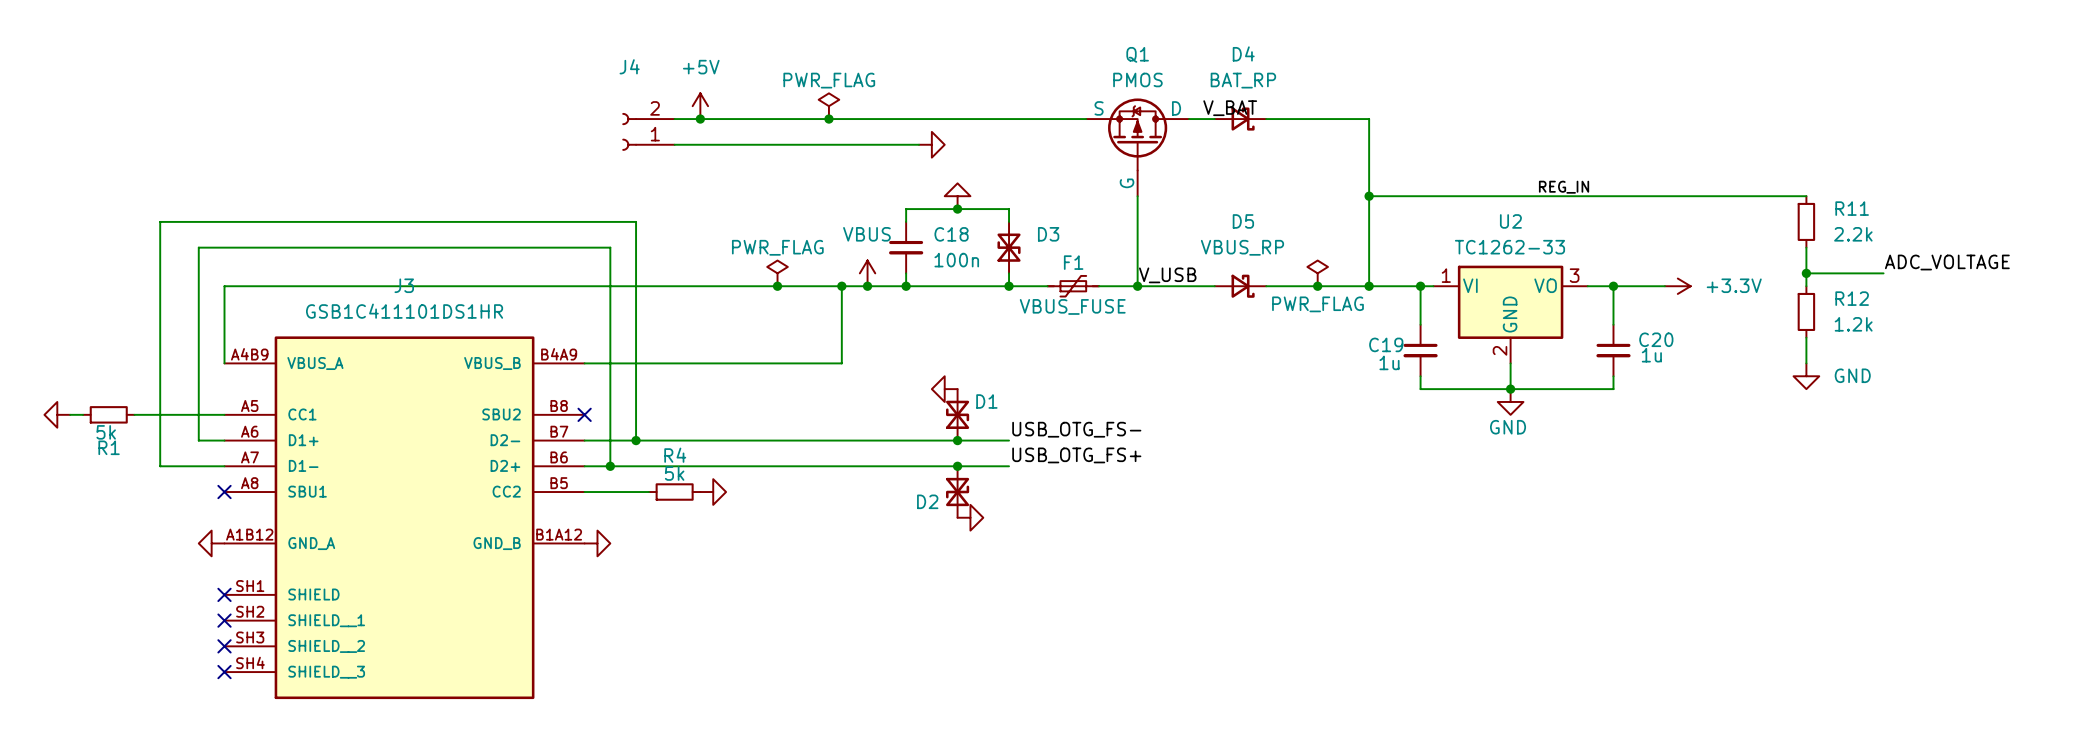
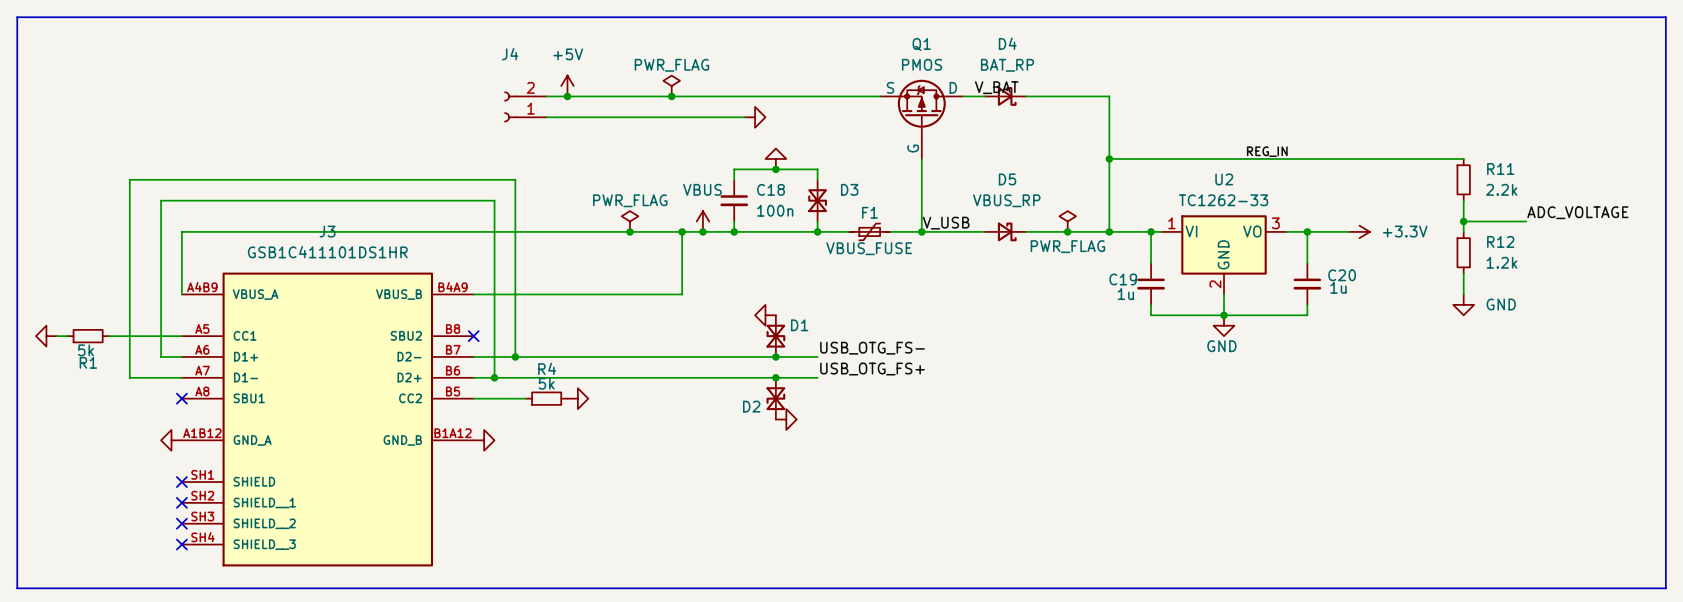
line: none -> (17, 17) (1665, 17) (1665, 588) (17, 588) (17, 17)

